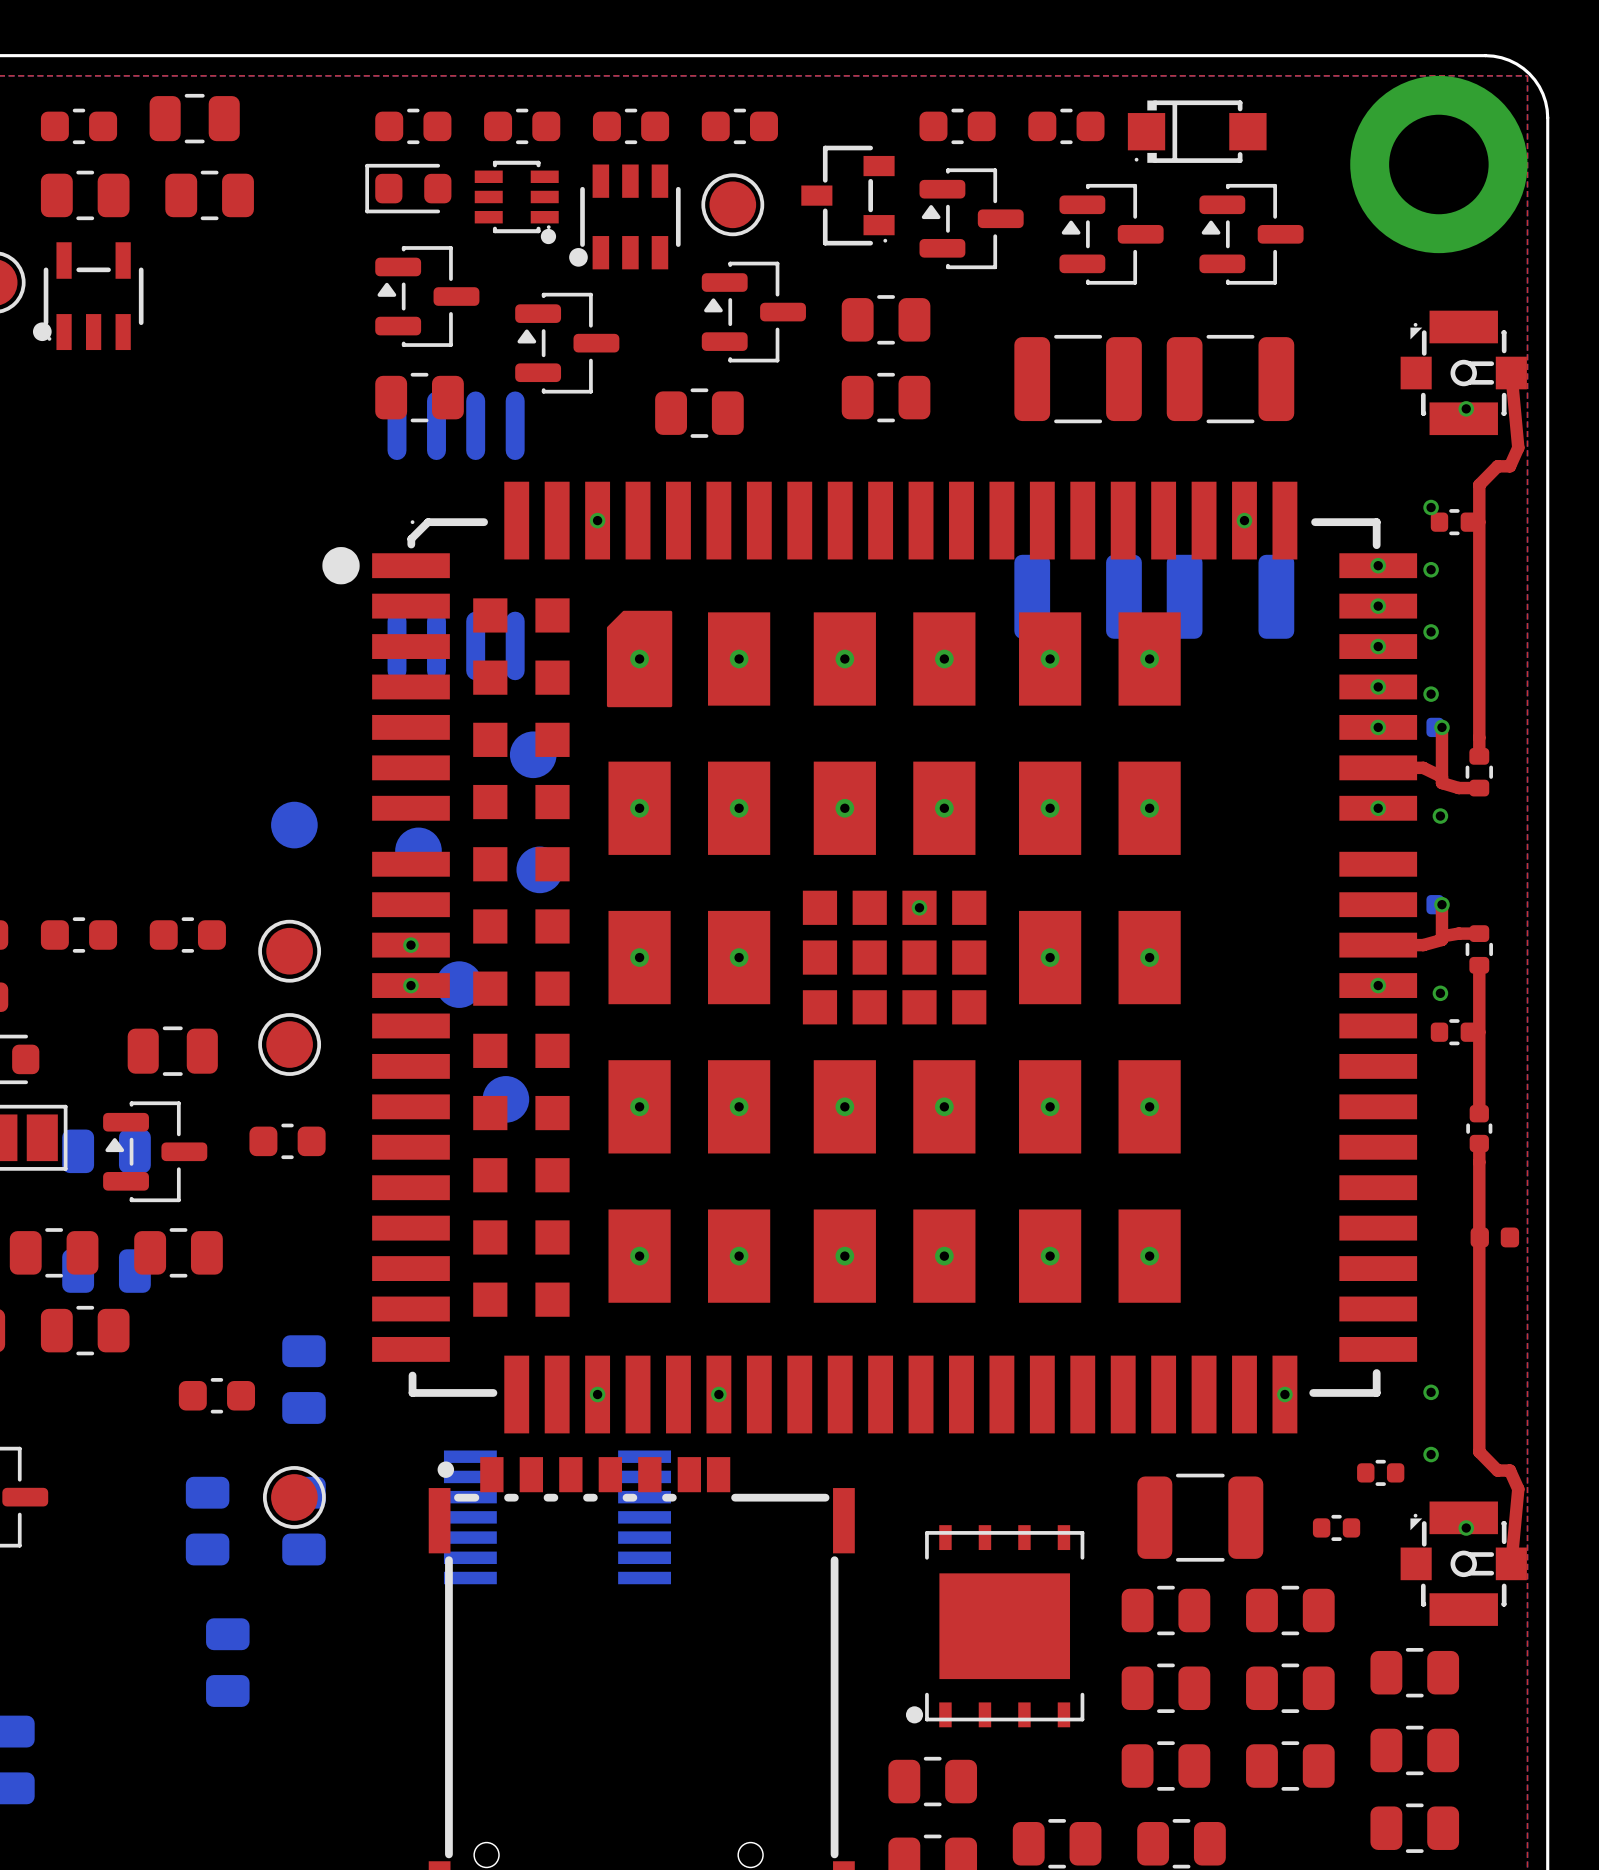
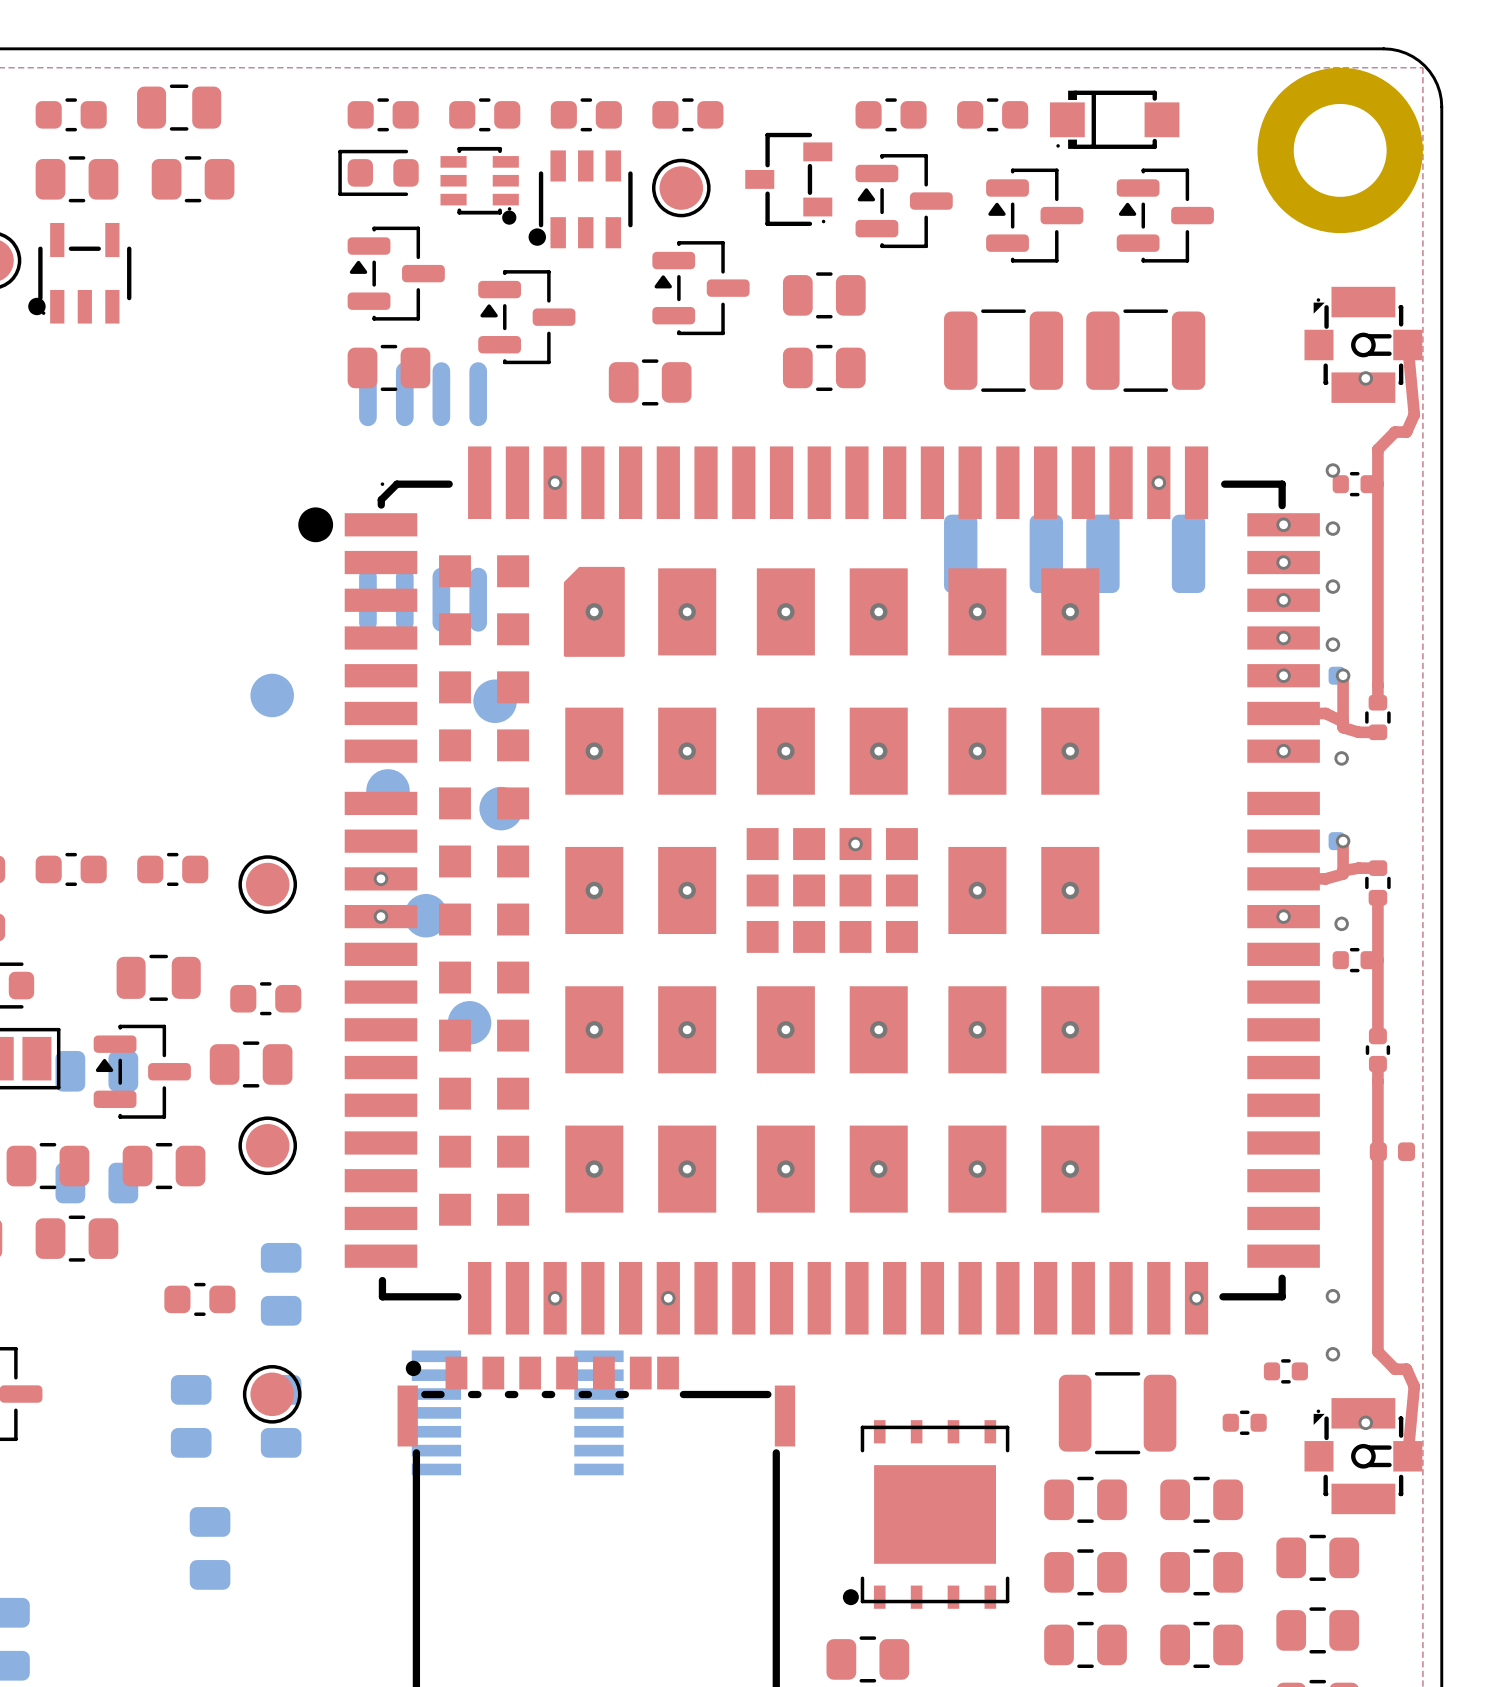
part position: (294, 825) -> (272, 695)
part footprint: [258, 1013, 322, 1076] -> [230, 982, 302, 1016]
part footprint: [249, 1123, 326, 1160] -> [209, 1041, 293, 1088]
part: none -> (267, 1145)

